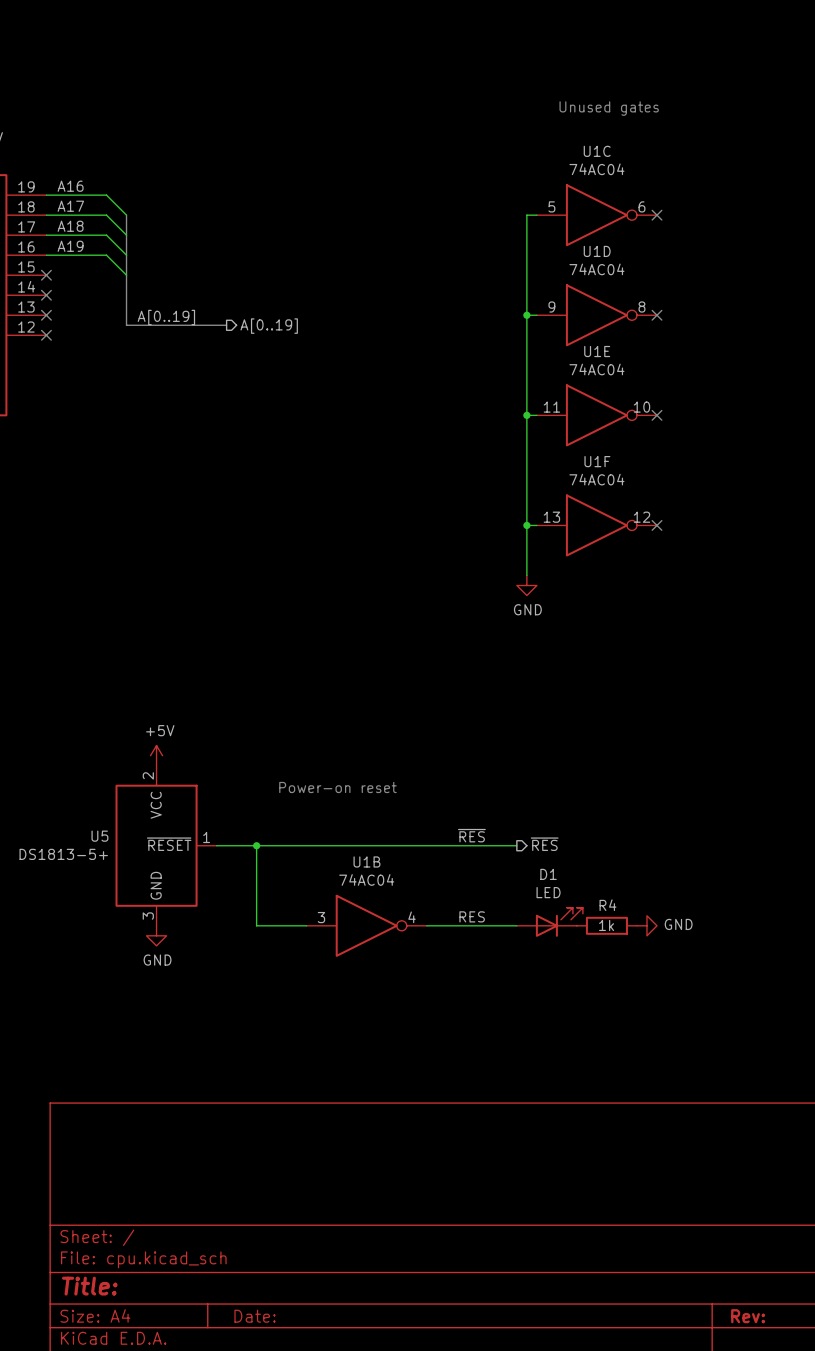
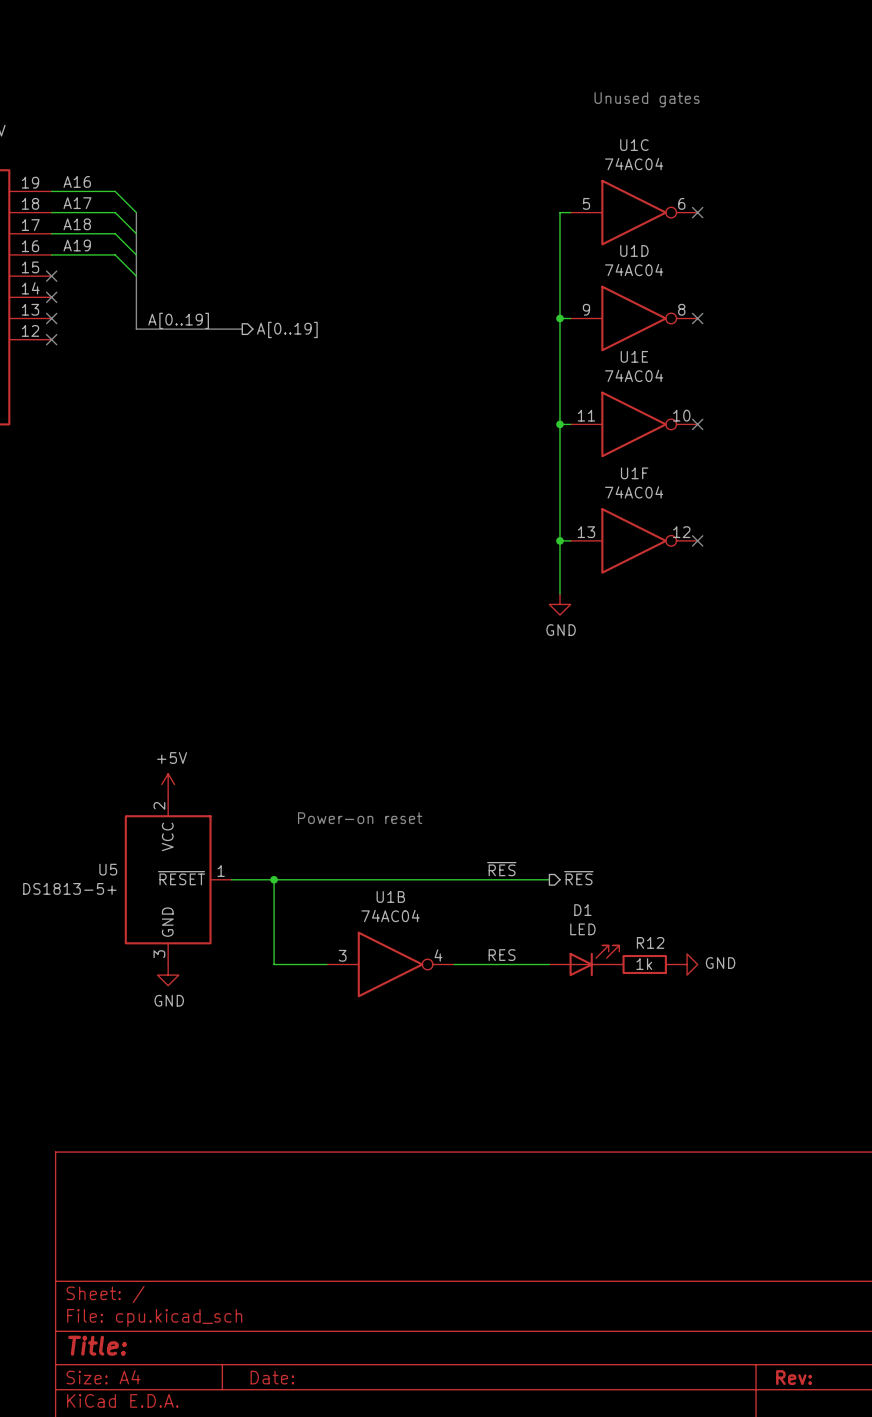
R4 name: R4 (607, 905) -> R12 (650, 942)

